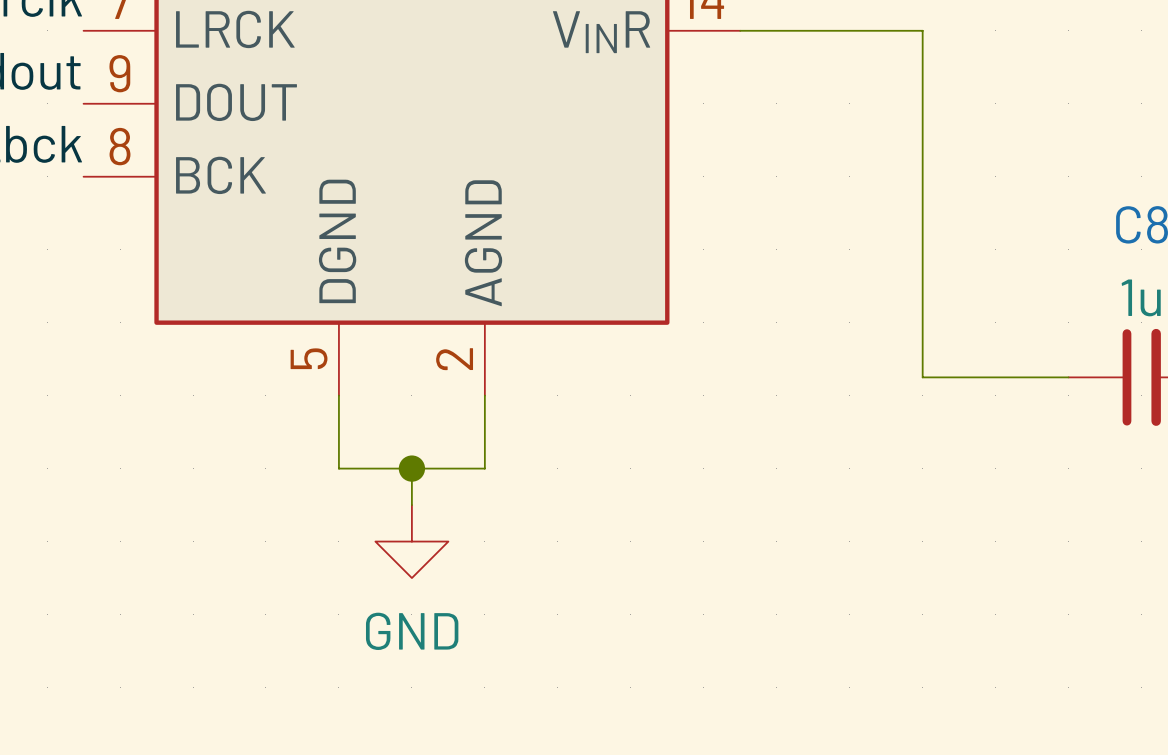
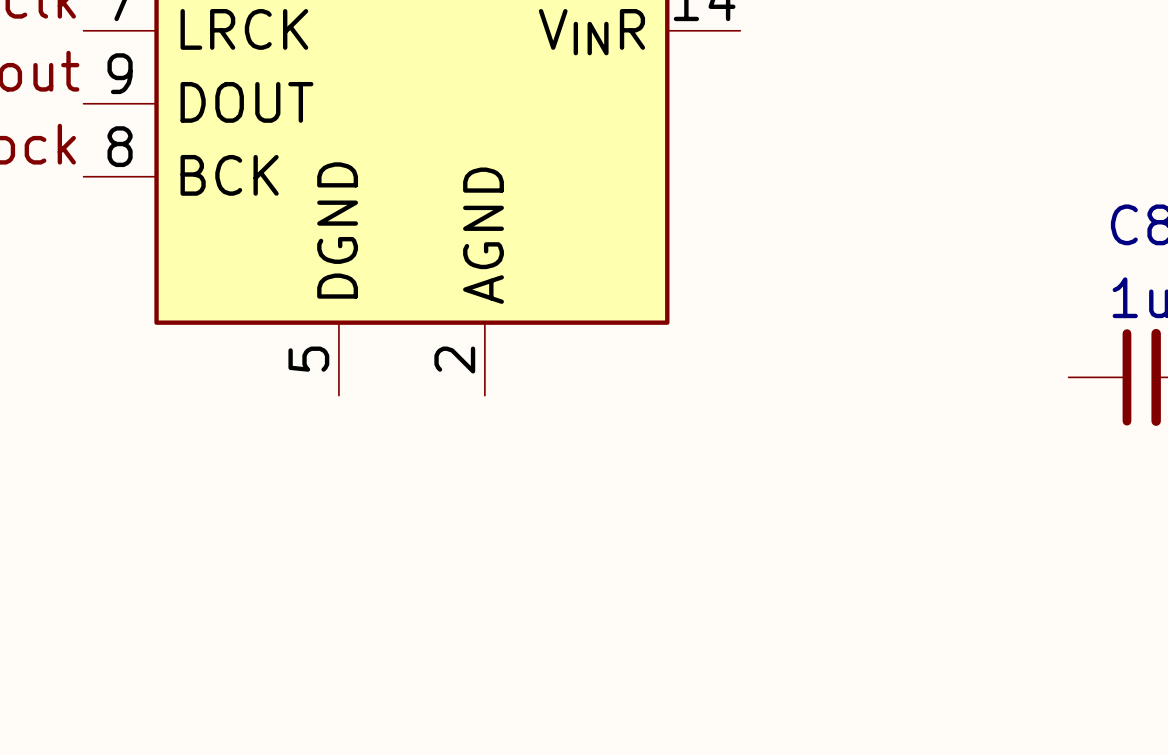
wire: (740, 30) (922, 30) (922, 377) (1068, 377) -> none
wire: (338, 395) (338, 468) (484, 468) (484, 395) -> none
wire: (411, 468) (411, 505) -> none
junction: (411, 468) -> none
power symbol: GND (411, 541) -> none

